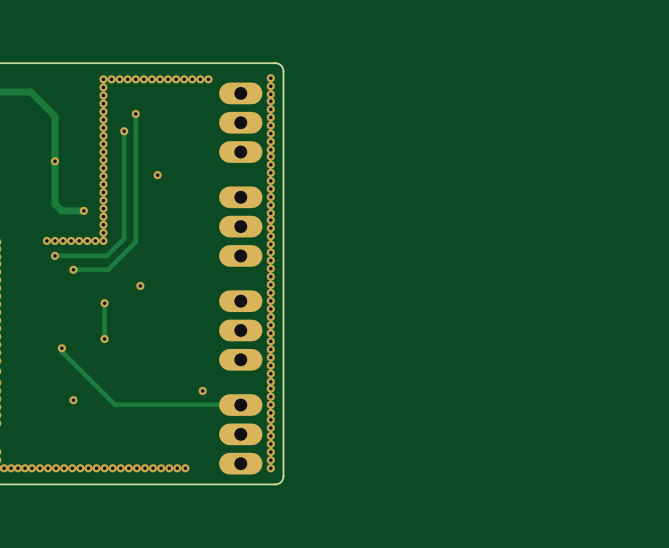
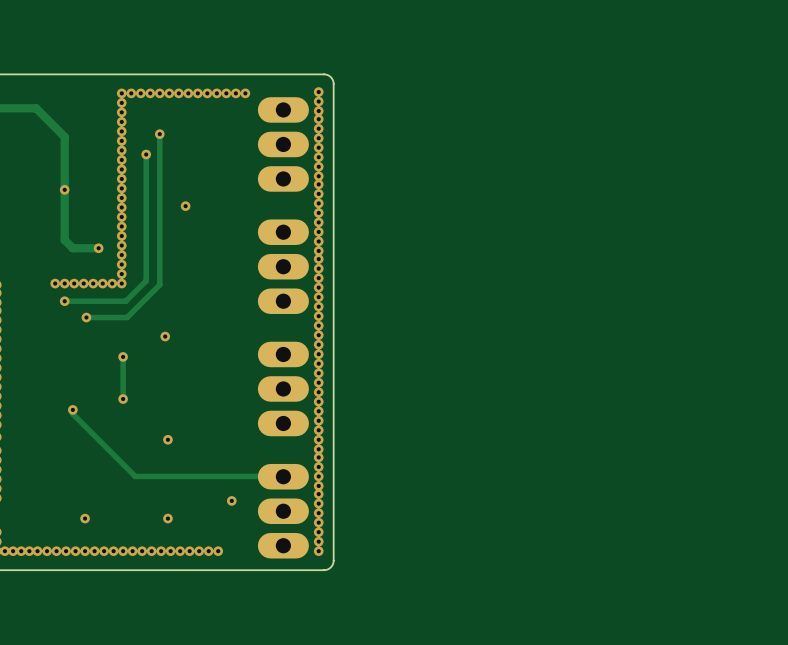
via: none -> (167, 439)
via: (202, 390) -> none
via: (73, 400) -> none
via: none -> (231, 500)
via: none -> (85, 518)
via: none -> (167, 518)

